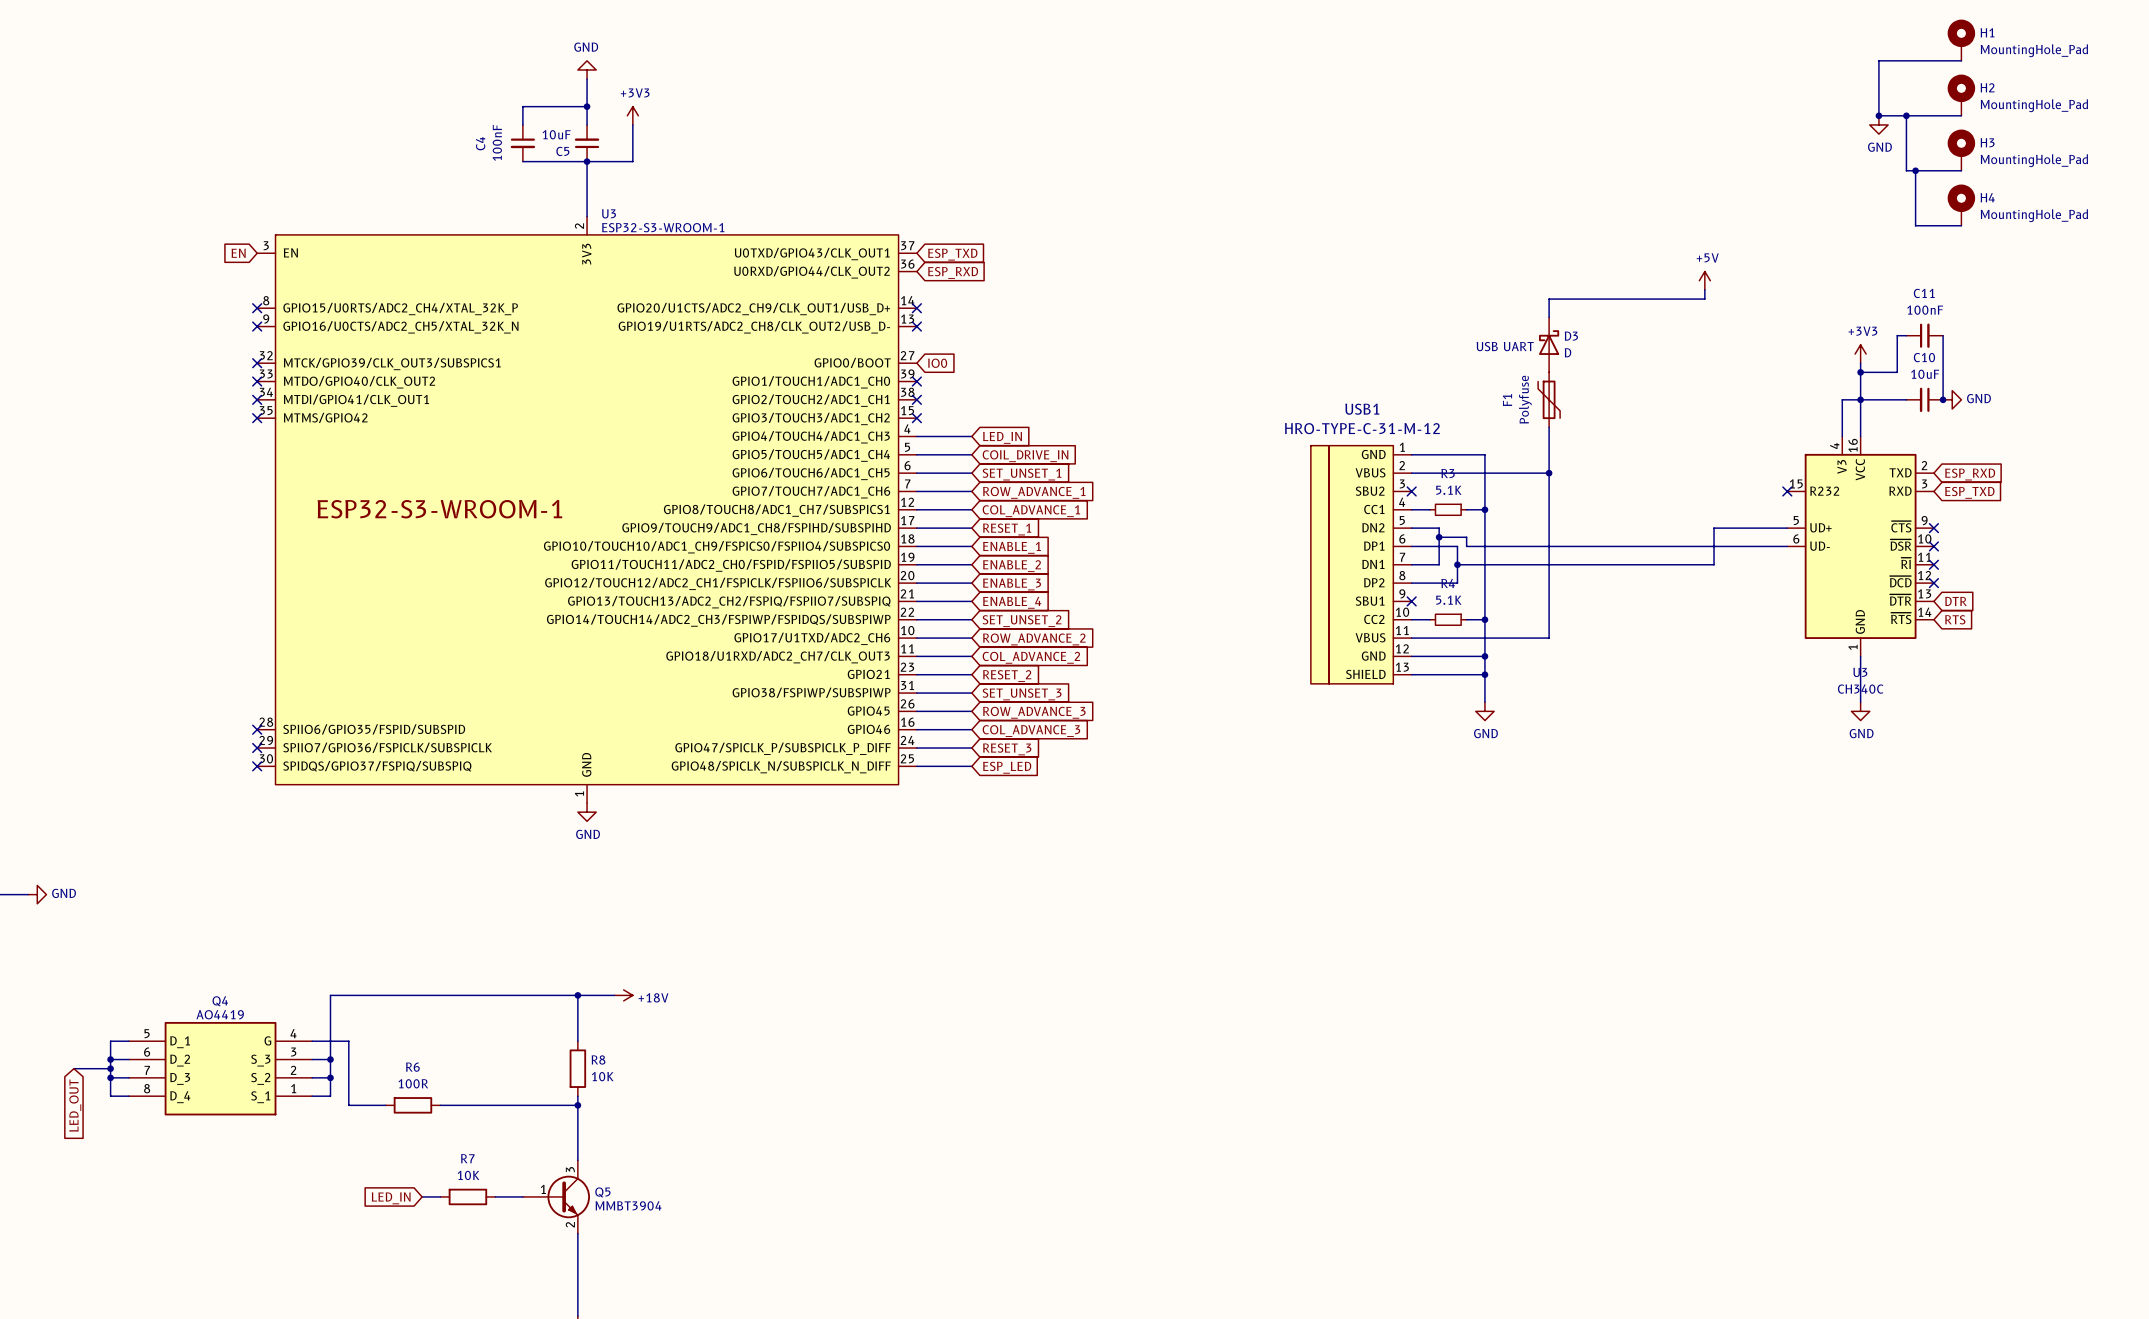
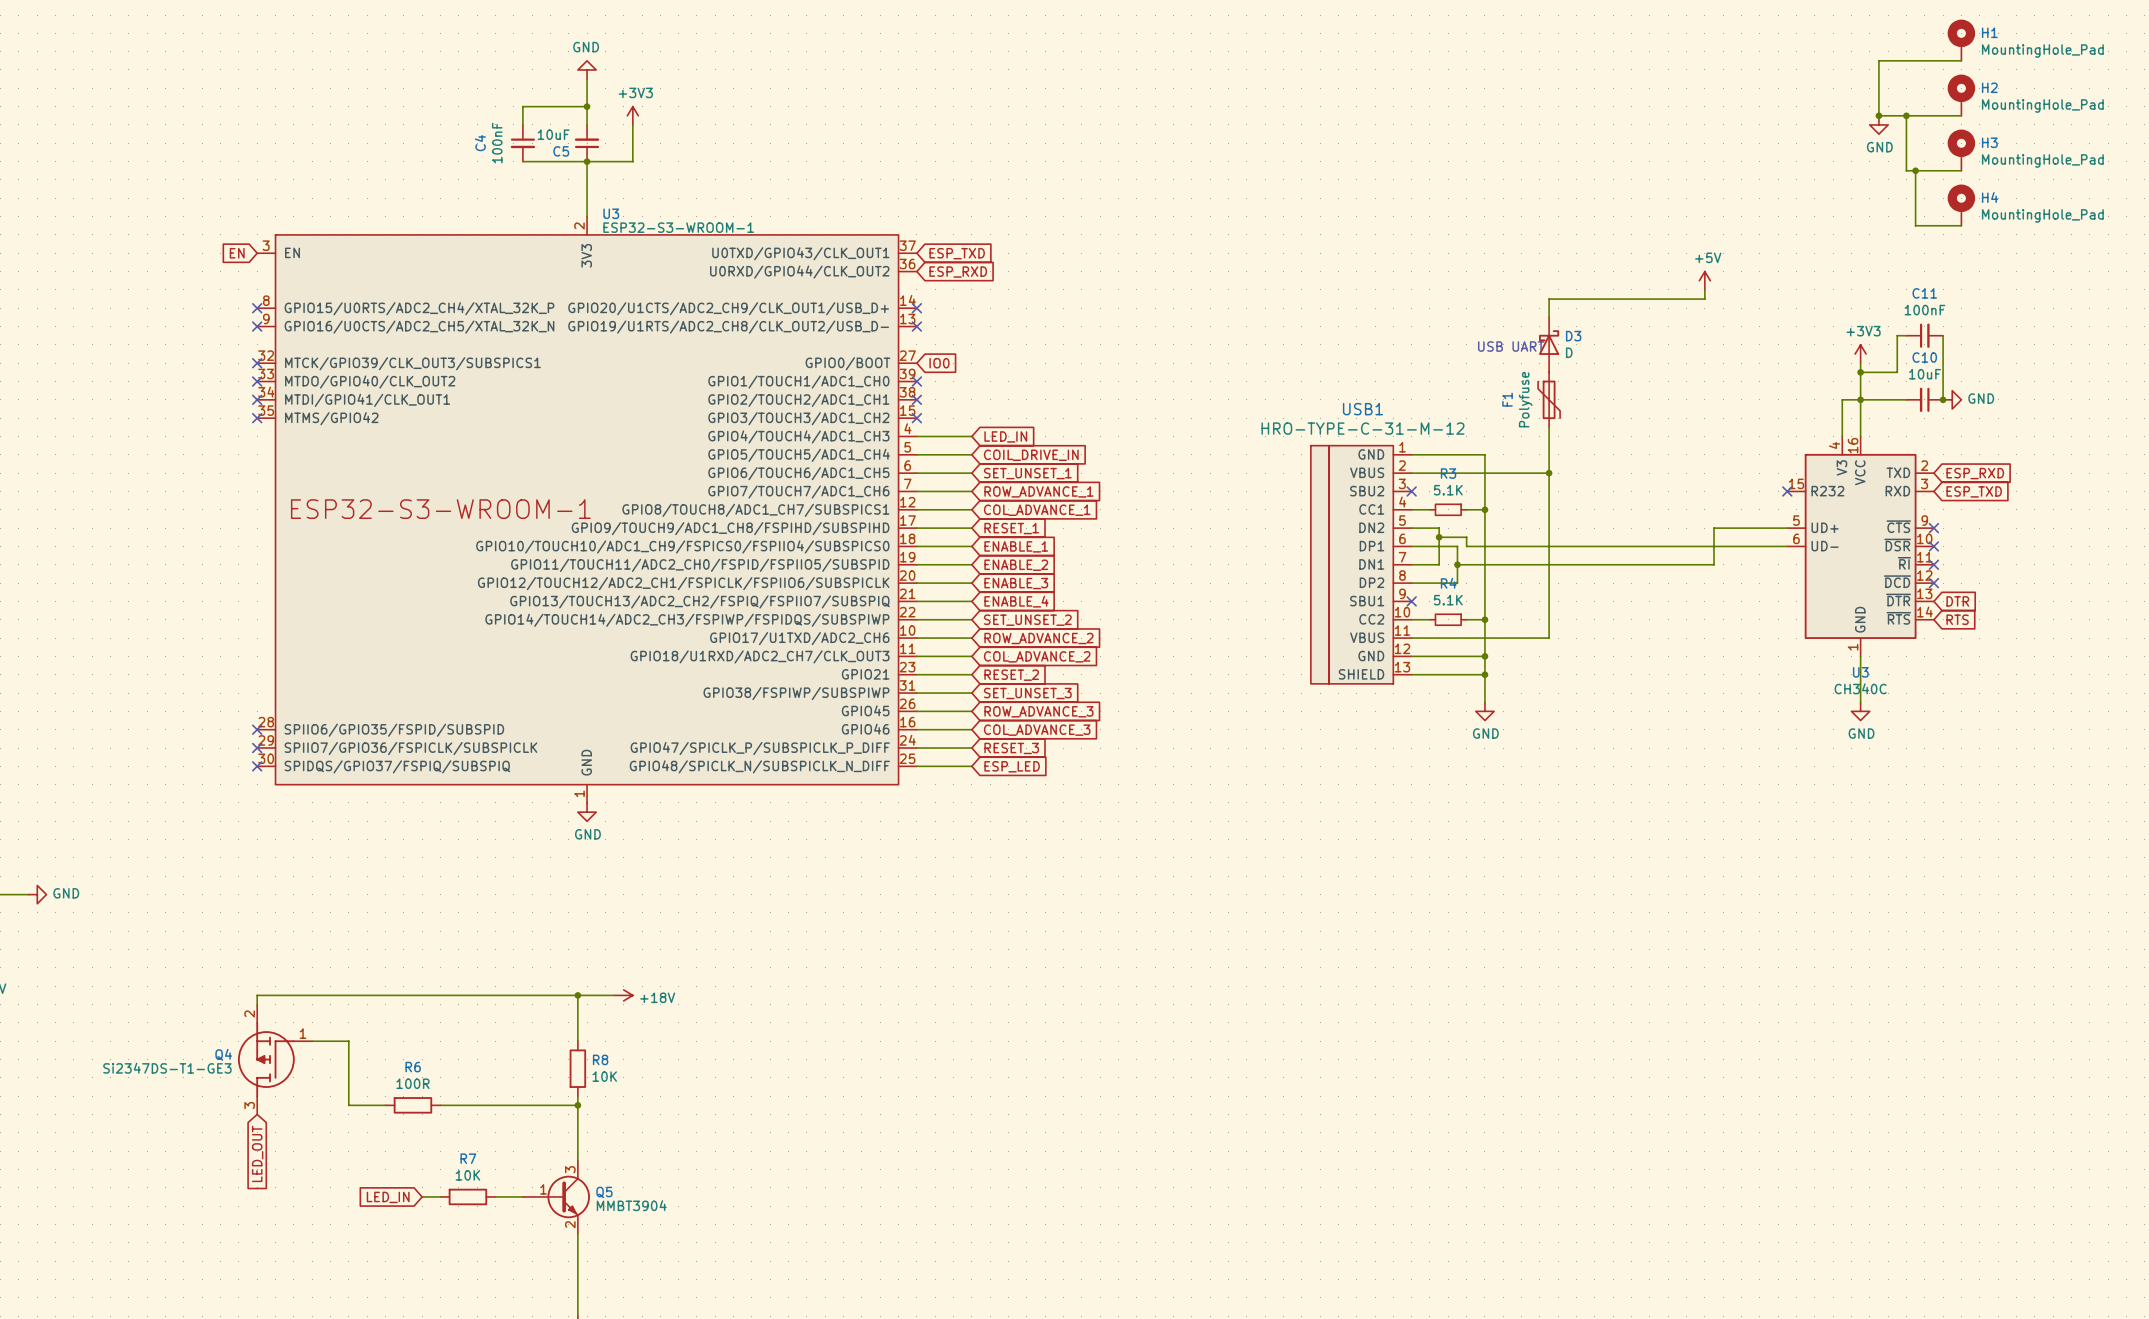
wire: (330, 995) (330, 1096) (312, 1096) -> (330, 995) (257, 995) (257, 1004)
Q4 name position: Q4 (220, 1001) -> Q4 (223, 1054)
Q4 value: AO4419 (220, 1014) -> Si2347DS-T1-GE3 (167, 1068)
Q4 symbol: [128, 1021, 313, 1116] -> [237, 1004, 313, 1115]
wire: (128, 1041) (110, 1041) (110, 1096) (128, 1096) -> none
wire: (110, 1059) (128, 1059) -> none
junction: (110, 1059) -> none
wire: (312, 1059) (330, 1059) -> none
junction: (330, 1059) -> none
wire: (73, 1068) (110, 1068) -> none
junction: (110, 1068) -> none
wire: (110, 1077) (128, 1077) -> none
junction: (110, 1077) -> none
wire: (312, 1077) (330, 1077) -> none
junction: (330, 1077) -> none
global label: LED_OUT (75, 1105) -> none
global label: none -> LED_OUT (257, 1153)

